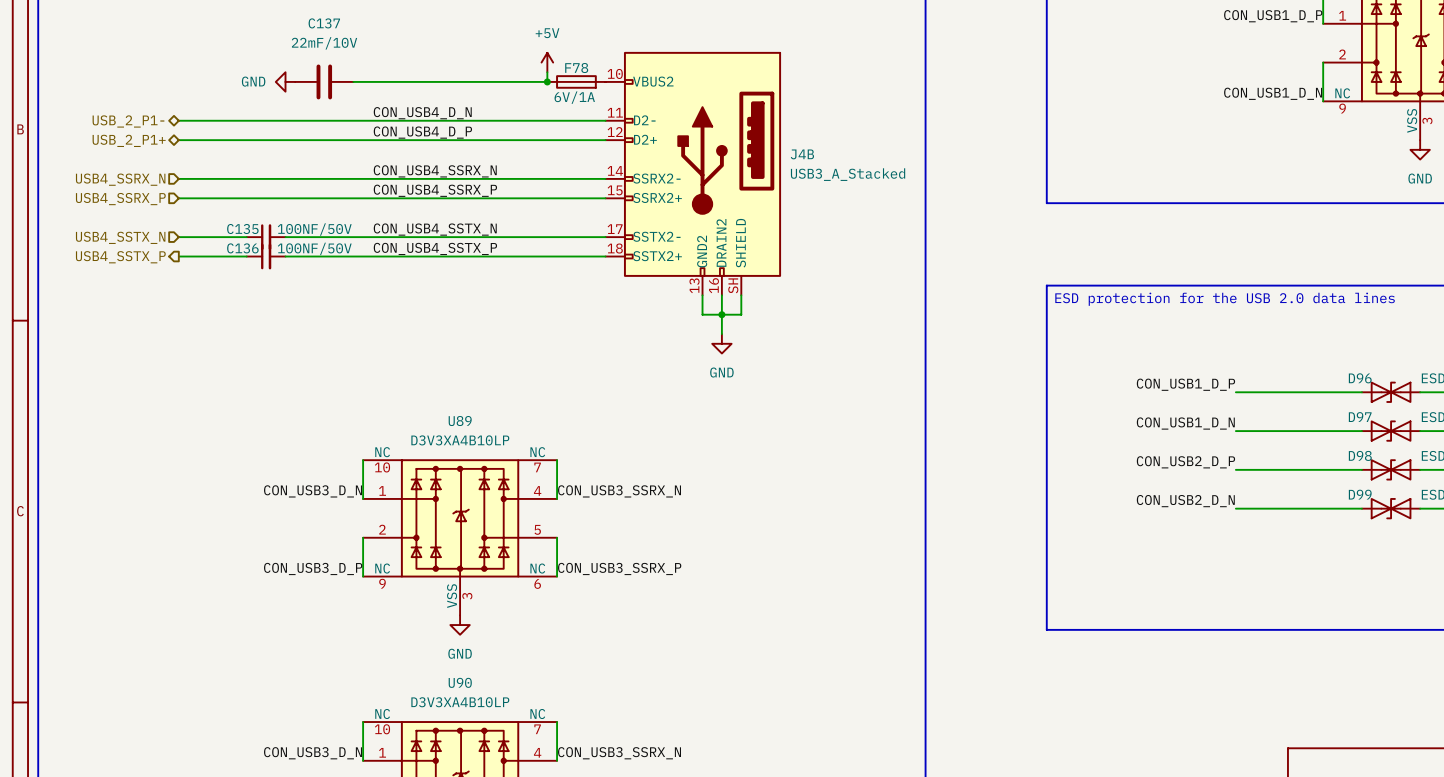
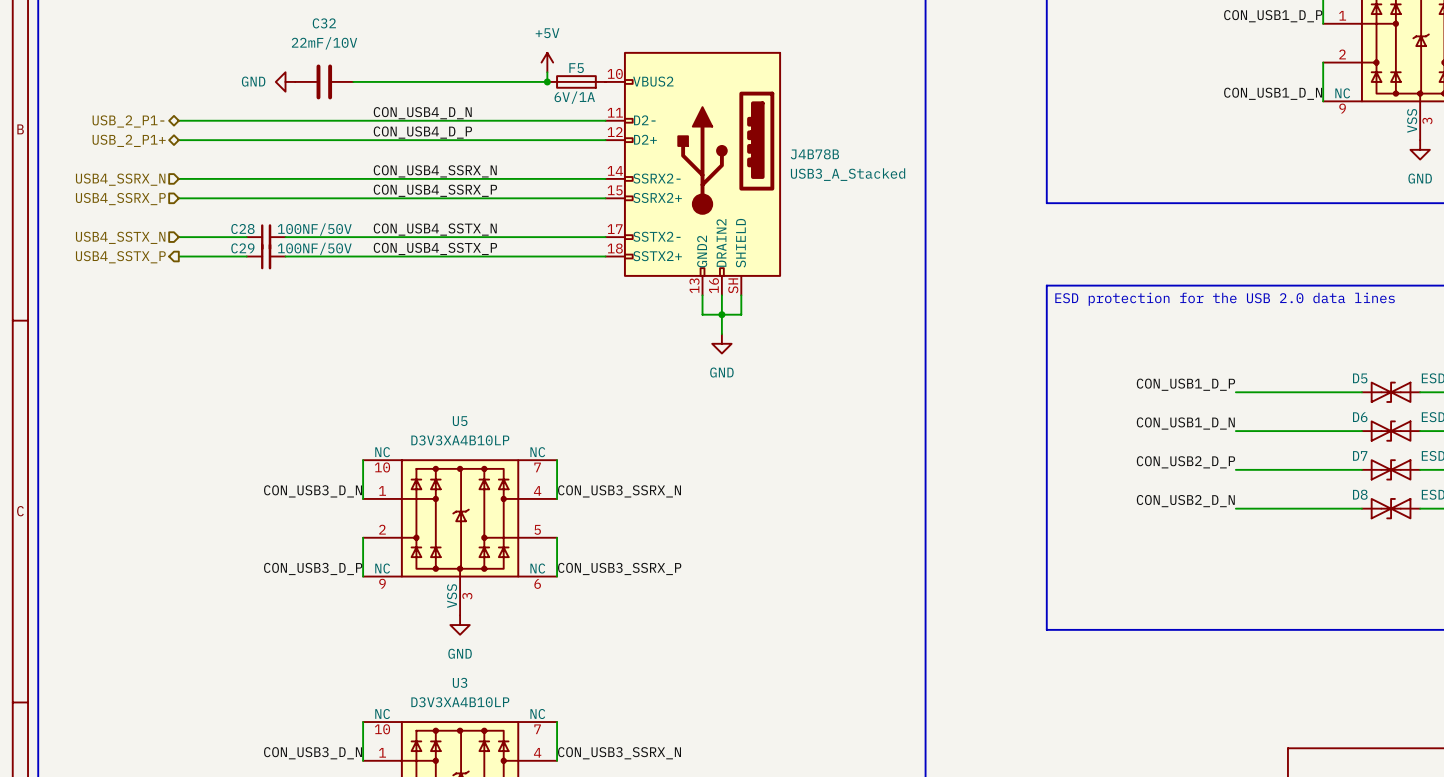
C137 name: C137 (324, 23) -> C32 (324, 23)
F78 name: F78 (576, 68) -> F5 (576, 68)
J4B name: J4B (802, 154) -> J4B78B (814, 154)
C135 name: C135 (242, 229) -> C28 (242, 229)
C136 name: C136 (242, 248) -> C29 (242, 248)
D96 name: D96 (1360, 378) -> D5 (1360, 378)
D97 name: D97 (1360, 417) -> D6 (1360, 417)
U89 name: U89 (460, 421) -> U5 (460, 421)
D98 name: D98 (1360, 455) -> D7 (1360, 455)
D99 name: D99 (1360, 494) -> D8 (1360, 494)
U90 name: U90 (460, 682) -> U3 (460, 682)

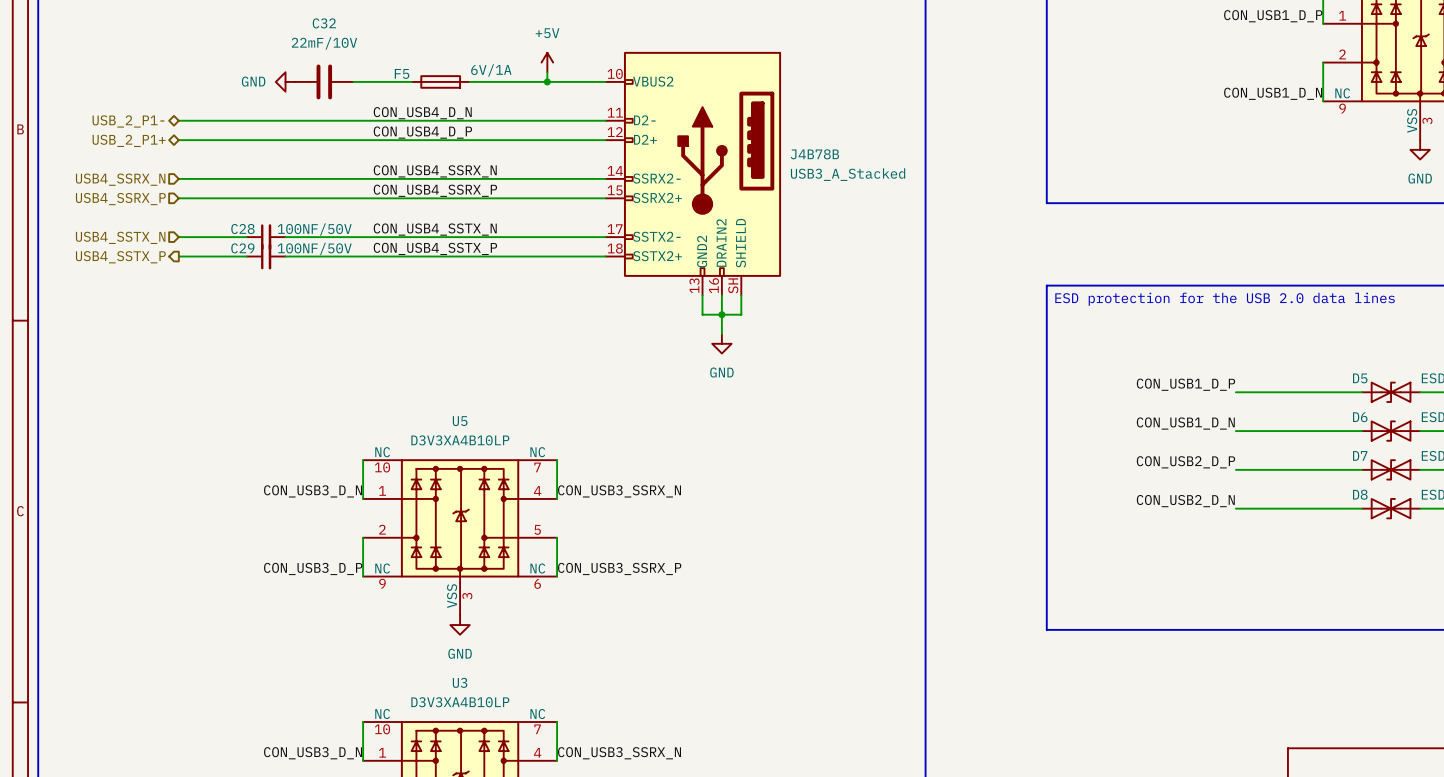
F5 name position: F5 (576, 68) -> F5 (402, 73)
F5 position: (576, 81) -> (440, 81)
F5 value position: 6V/1A (574, 97) -> 6V/1A (491, 70)

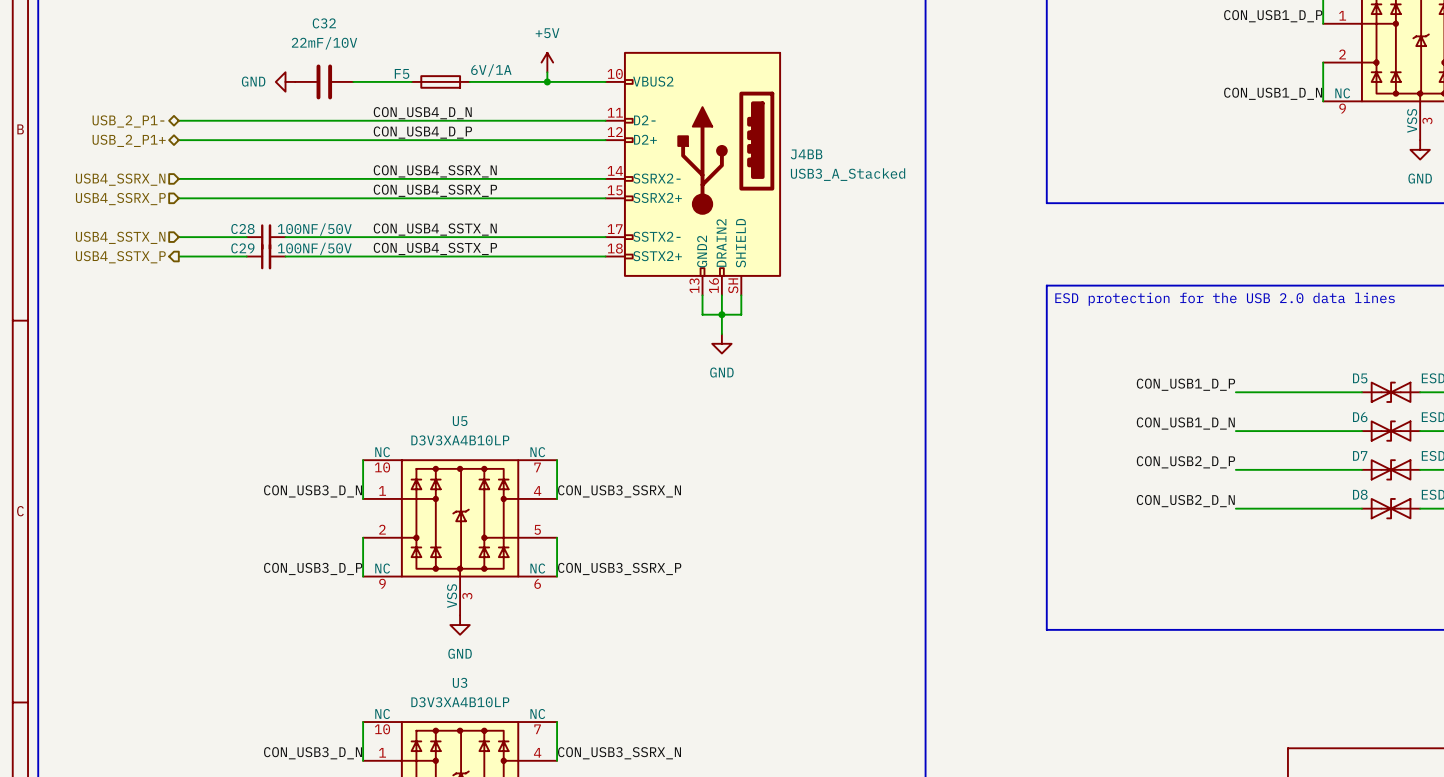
J4B78B name: J4B78B (814, 154) -> J4BB (806, 154)

